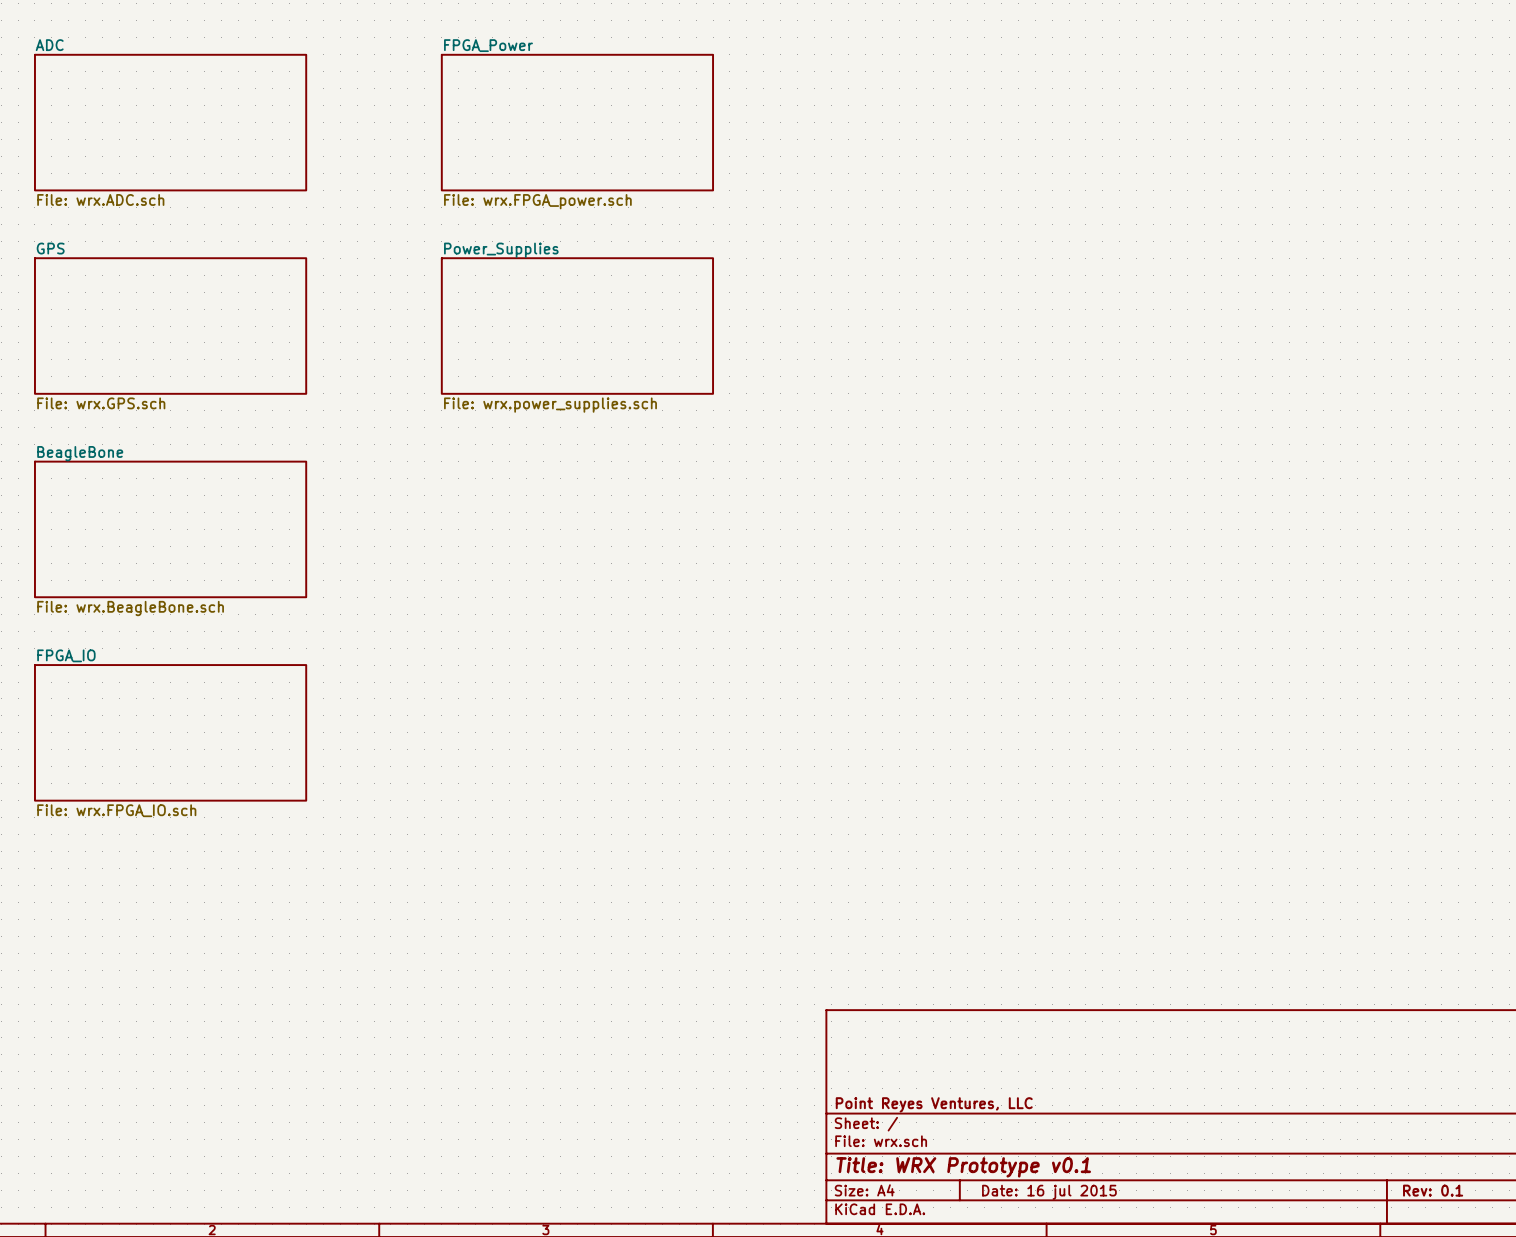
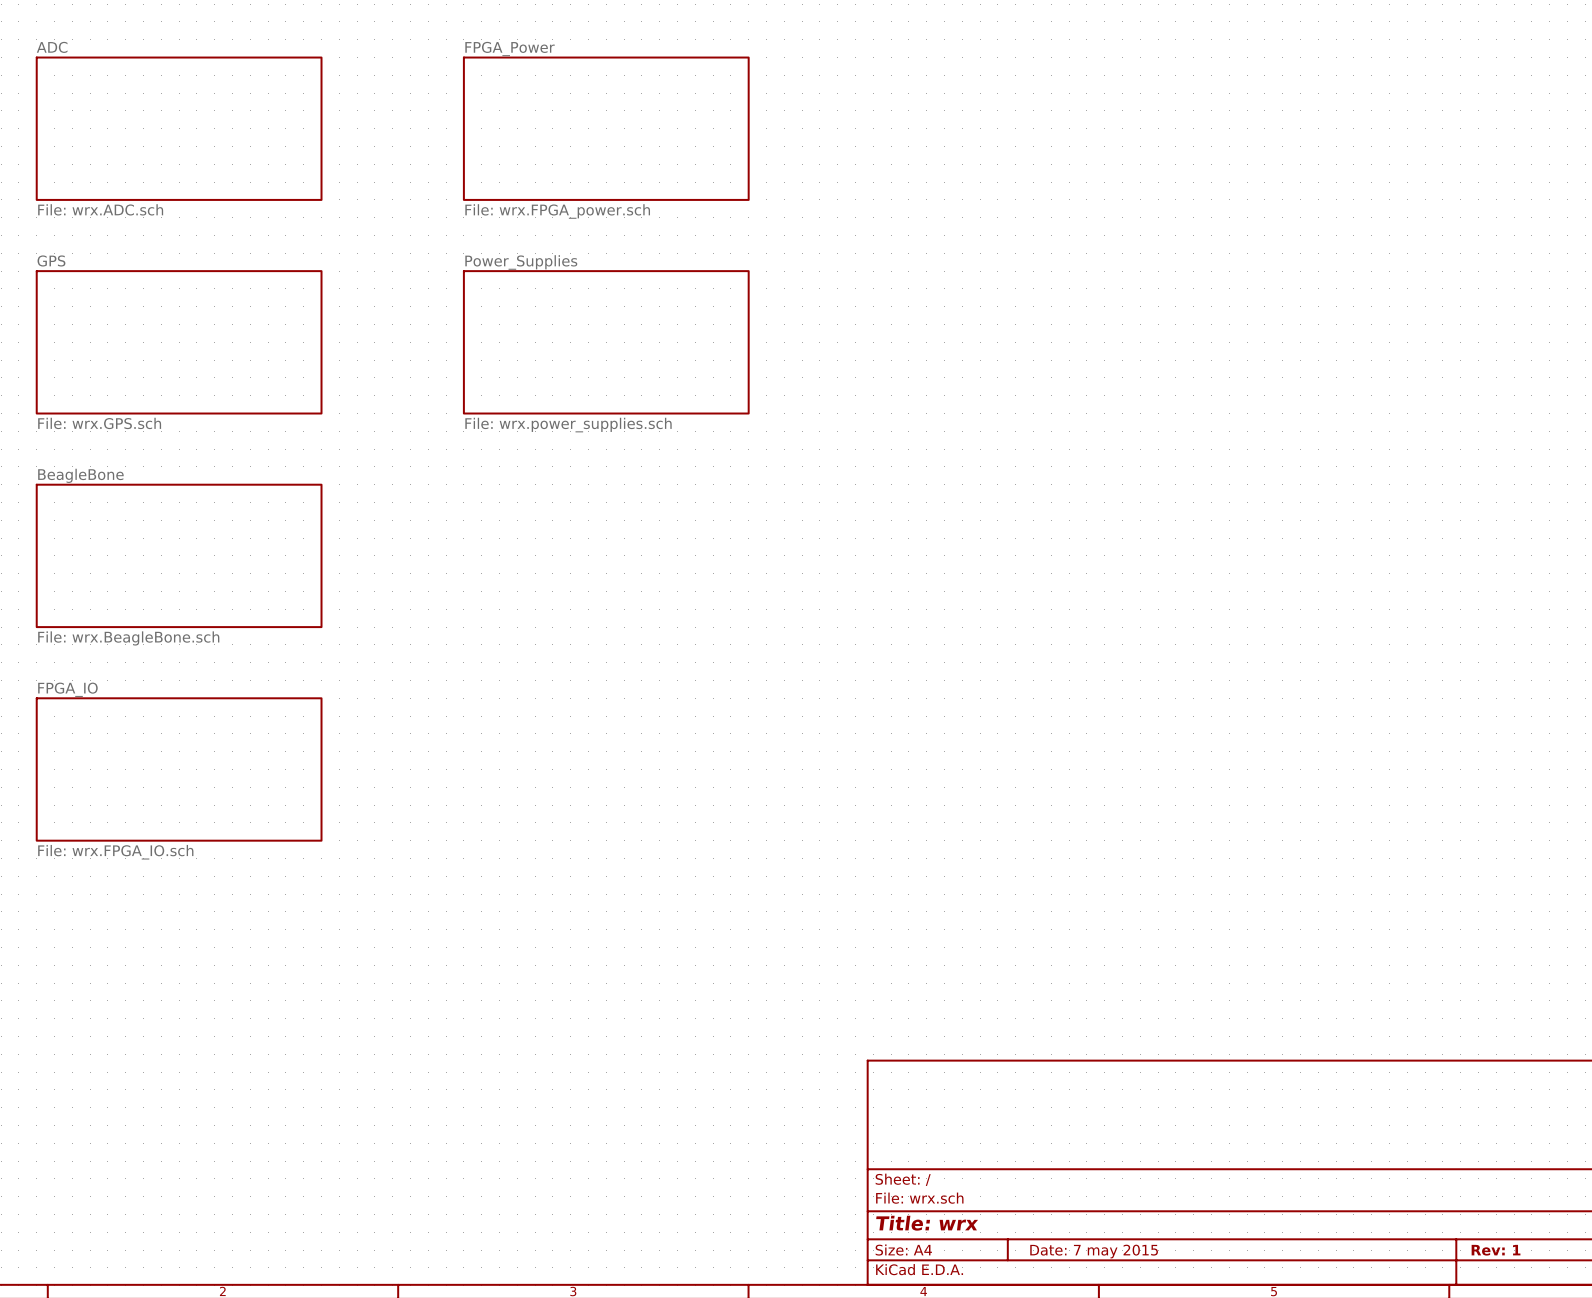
title block: Point Reyes Ventures, LLC (934, 1104) -> none
title block: Title: WRX Prototype v0.1 (963, 1167) -> Title: wrx (927, 1223)
title block: Rev: 0.1 (1433, 1190) -> Rev: 1 (1496, 1250)
title block: Date: 16 jul 2015 (1049, 1192) -> Date: 7 may 2015 (1094, 1251)

